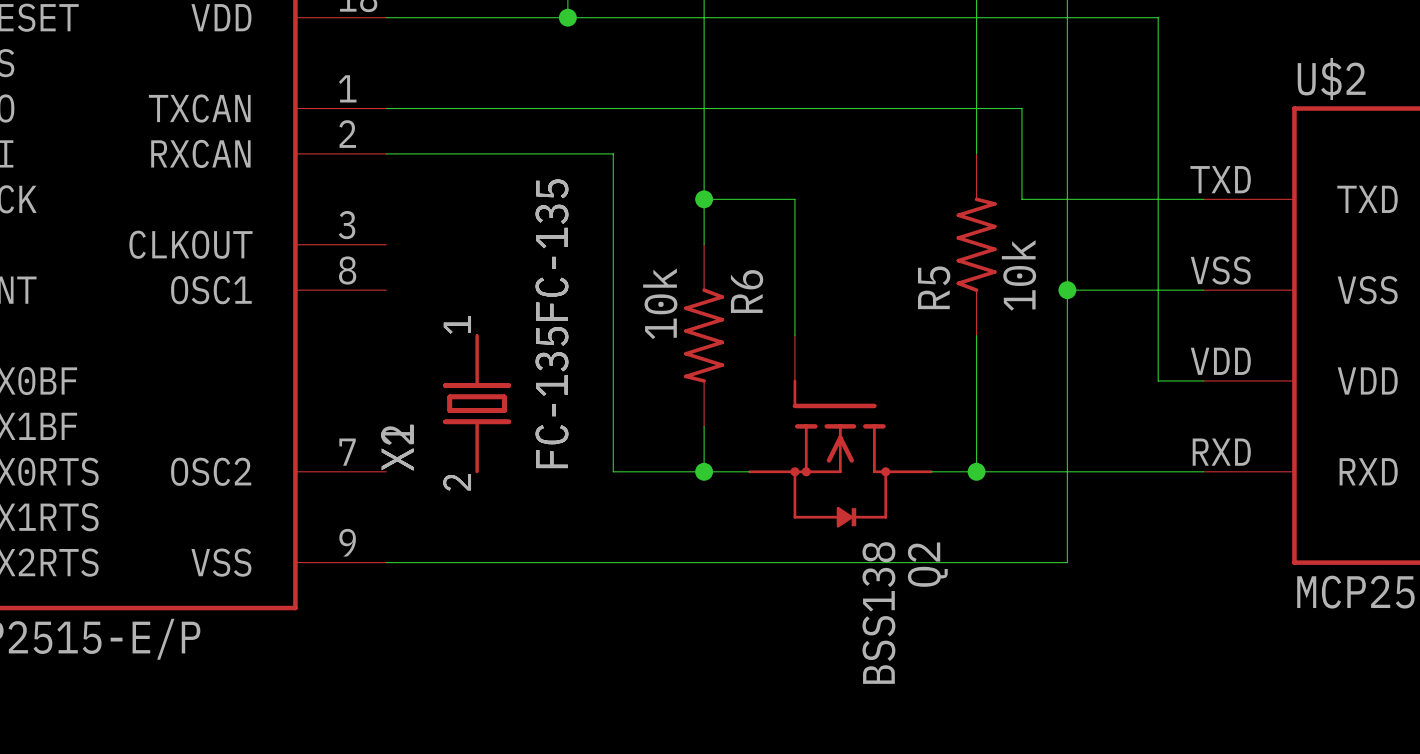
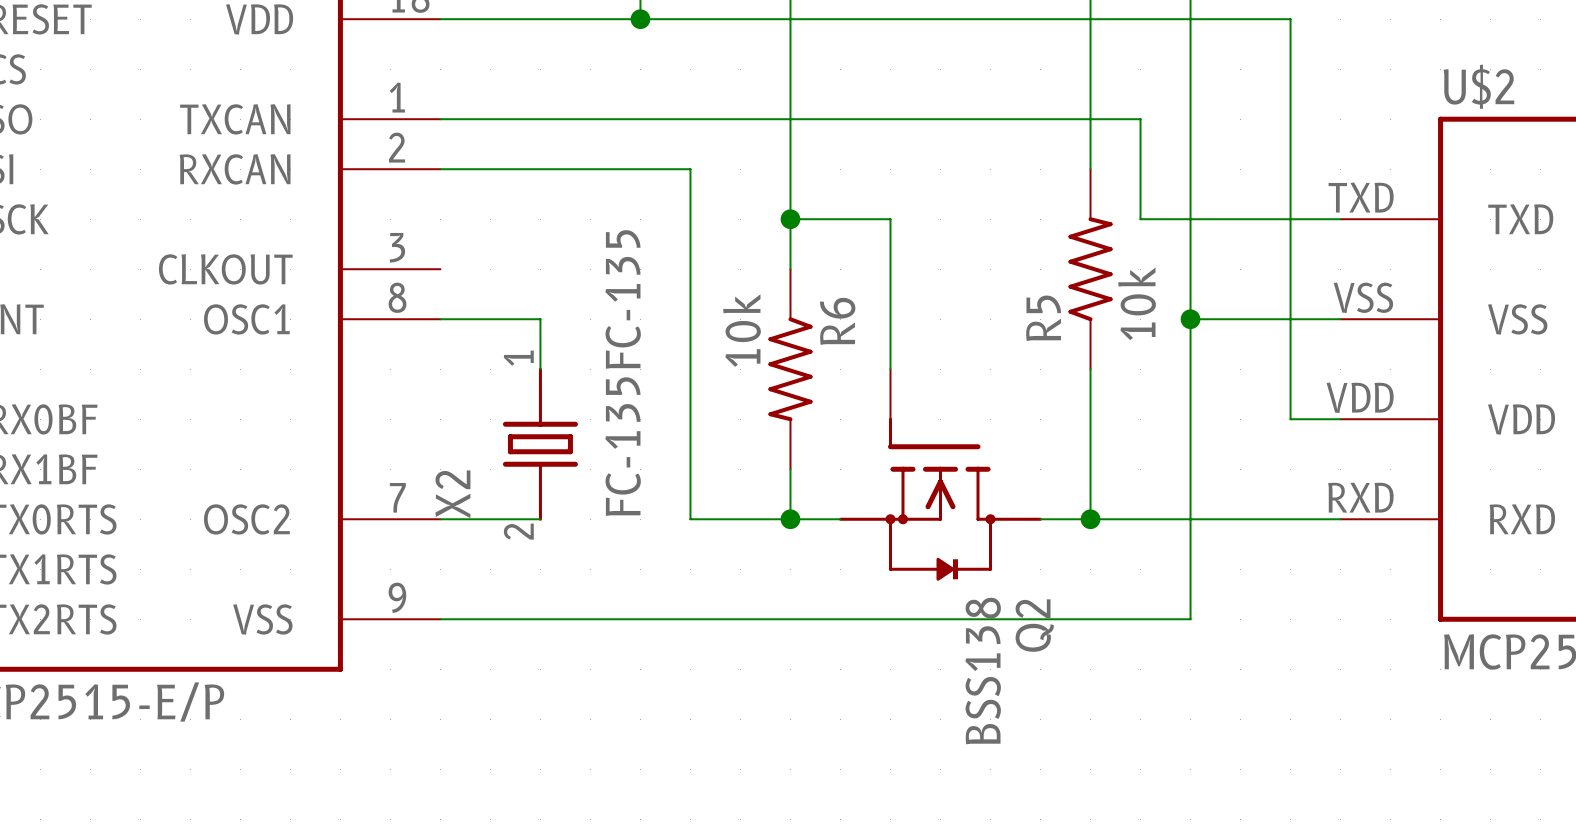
wire: none -> (440, 319) (540, 319) (540, 369)
part: FC-135FC-135 (477, 403) -> none
wire: none -> (440, 519) (540, 519)

